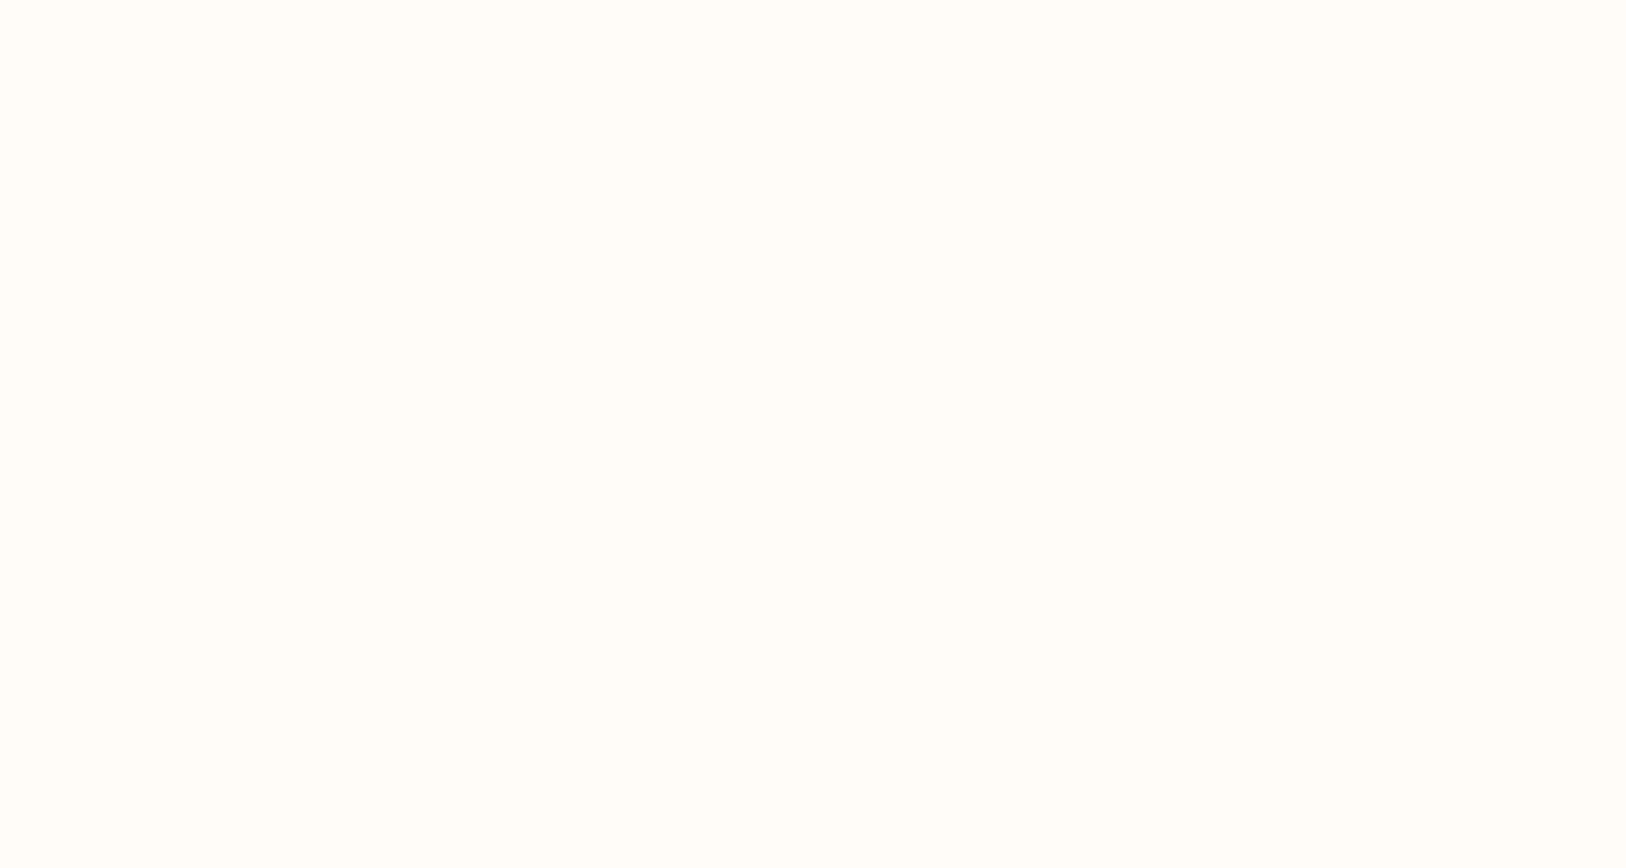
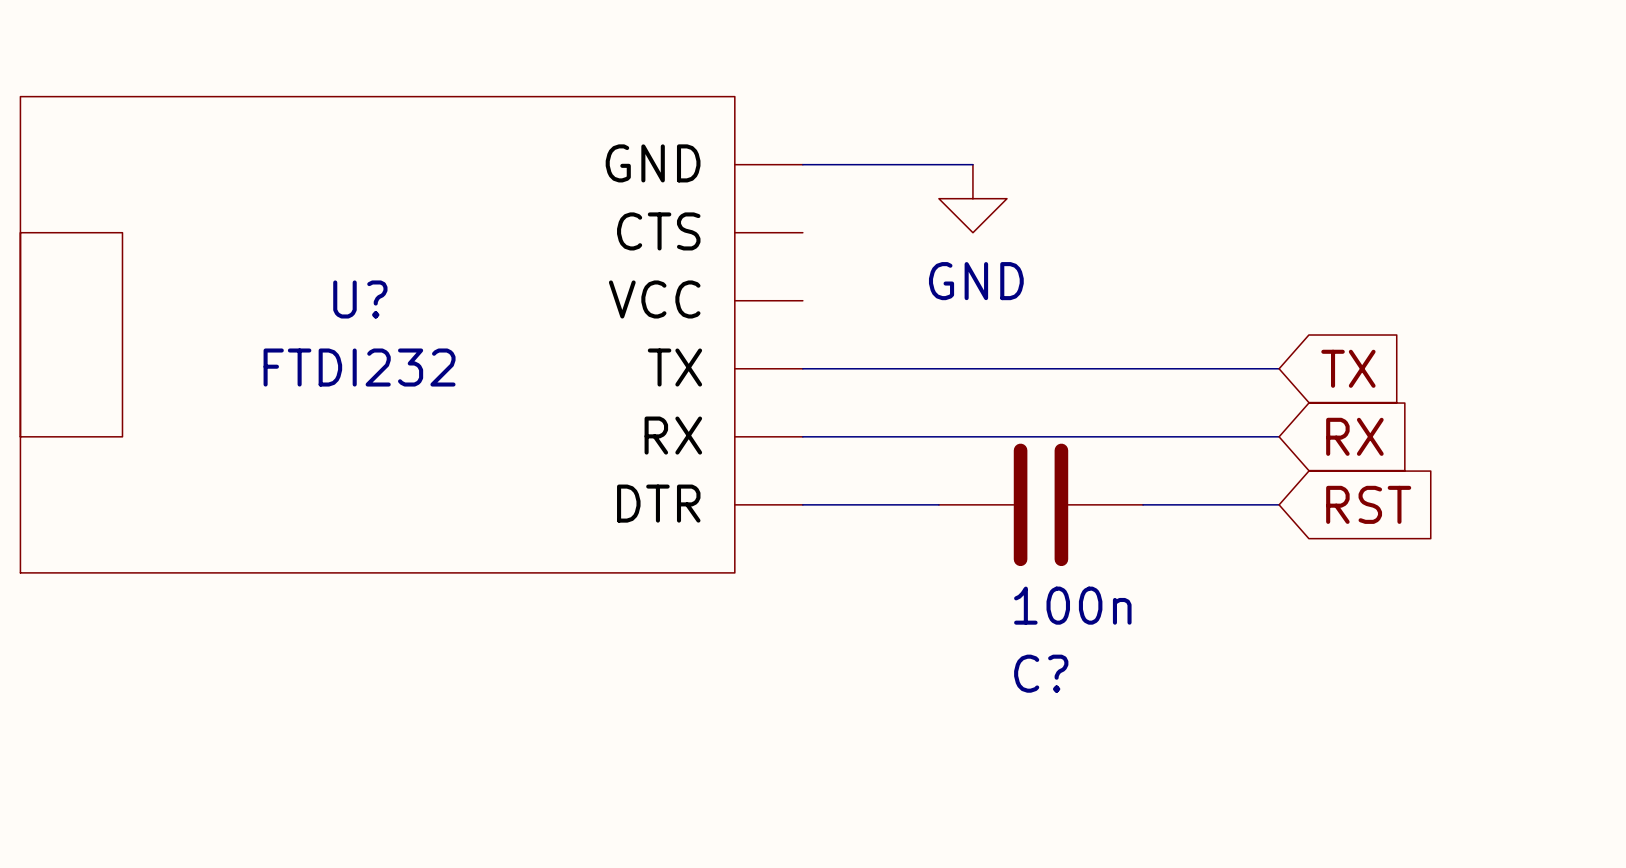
wire: none -> (802, 164) (972, 164)
power symbol: none -> GND (972, 198)
U?: none -> FTDI232 (411, 334)
wire: none -> (802, 368) (1279, 368)
global label: none -> TX (1348, 368)
wire: none -> (802, 436) (1279, 436)
global label: none -> RX (1354, 436)
wire: none -> (802, 504) (938, 504)
C?: none -> 100n (1040, 504)
wire: none -> (1143, 504) (1279, 504)
global label: none -> RST (1368, 504)

